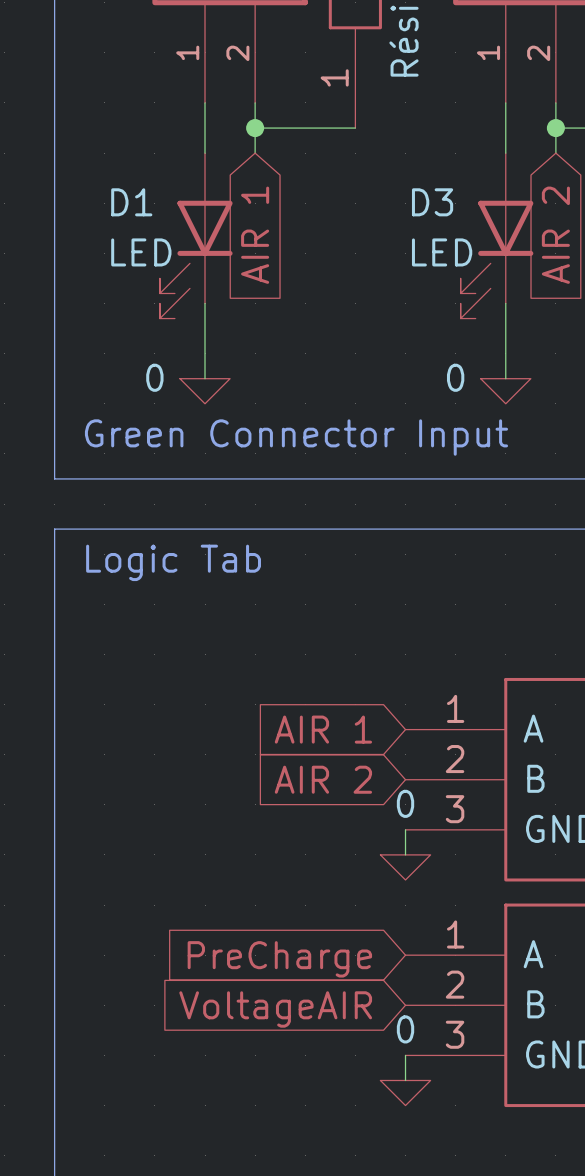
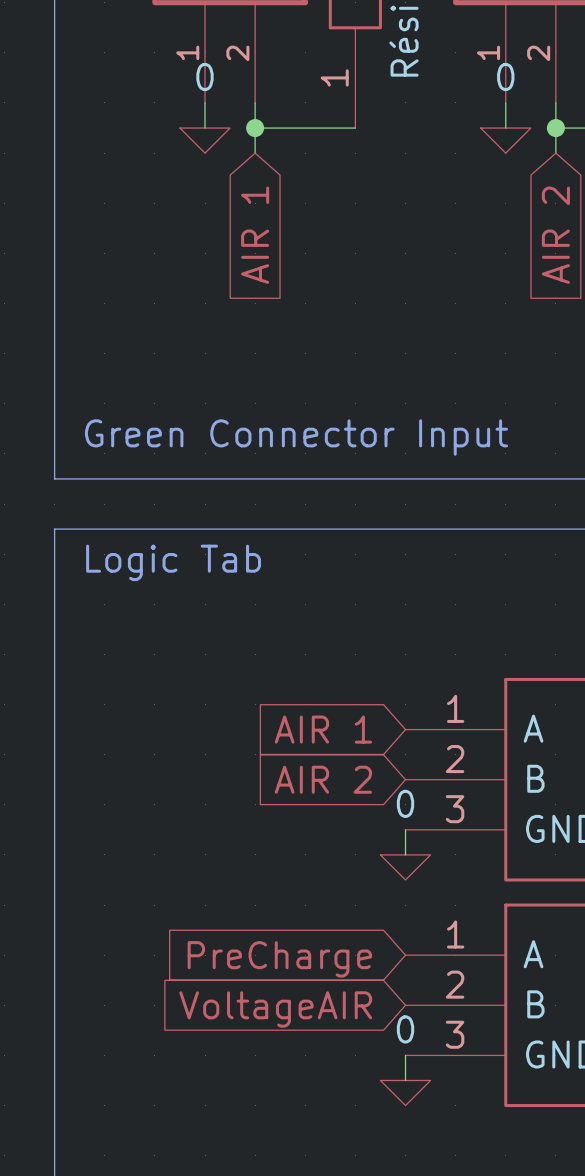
wire: (205, 128) (205, 153) -> none
wire: (505, 128) (505, 153) -> none
power symbol: none -> 0 (205, 140)
power symbol: none -> 0 (505, 140)
D1: LED (196, 235) -> none
D3: LED (496, 235) -> none
wire: (205, 303) (205, 378) -> none
wire: (505, 303) (505, 378) -> none
power symbol: 0 (205, 391) -> none
power symbol: 0 (505, 391) -> none

